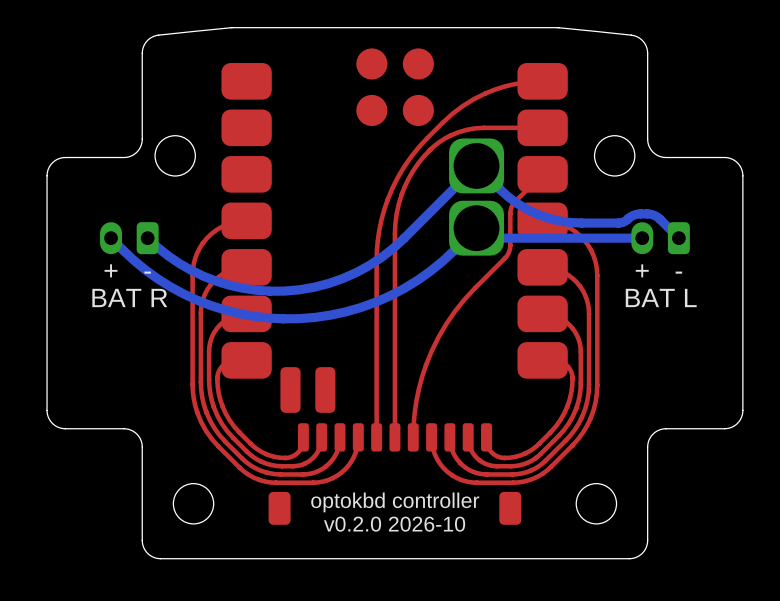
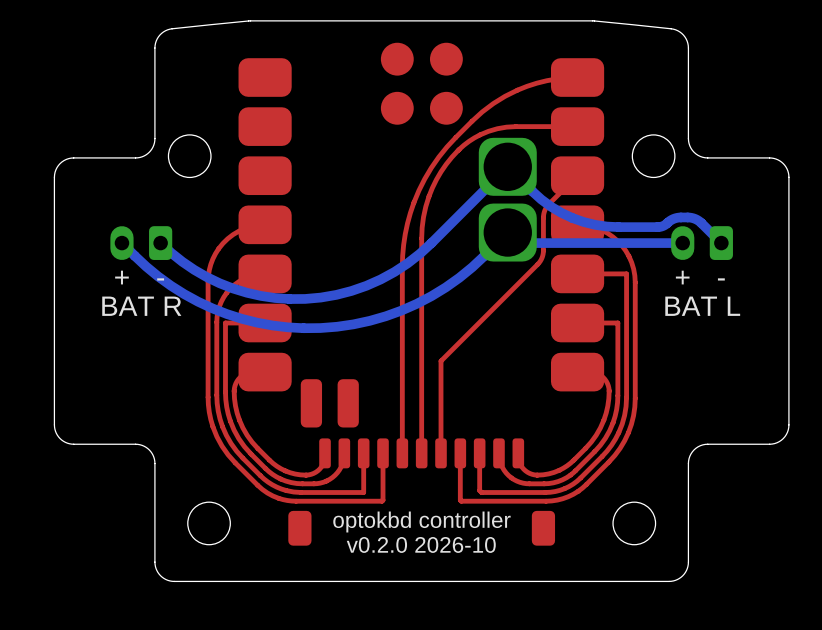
top track: (542, 267) (558, 270) (576, 282) (584, 294) (589, 313) -> (577, 273) (626, 273) (626, 322)
top track: (475, 288) (455, 311) (431, 350) (418, 388) (413, 437) -> (506, 295) (441, 361) (441, 453)
top track: (246, 313) (234, 315) (220, 324) (212, 335) (209, 351) -> (265, 322) (225, 322) (225, 362)
top track: (542, 313) (555, 316) (569, 325) (578, 339) (580, 352) -> (577, 322) (617, 322) (617, 363)
top track: (340, 437) (337, 449) (329, 463) (315, 472) (302, 474) -> (363, 453) (363, 492) (324, 492)
top track: (358, 437) (353, 456) (345, 469) (328, 480) (313, 482) -> (383, 453) (383, 500) (335, 501)
top track: (431, 437) (434, 453) (443, 468) (460, 479) (476, 482) -> (460, 453) (461, 501) (508, 501)
top track: (449, 437) (452, 451) (460, 463) (472, 471) (486, 474) -> (479, 453) (479, 490) (481, 492) (518, 492)

